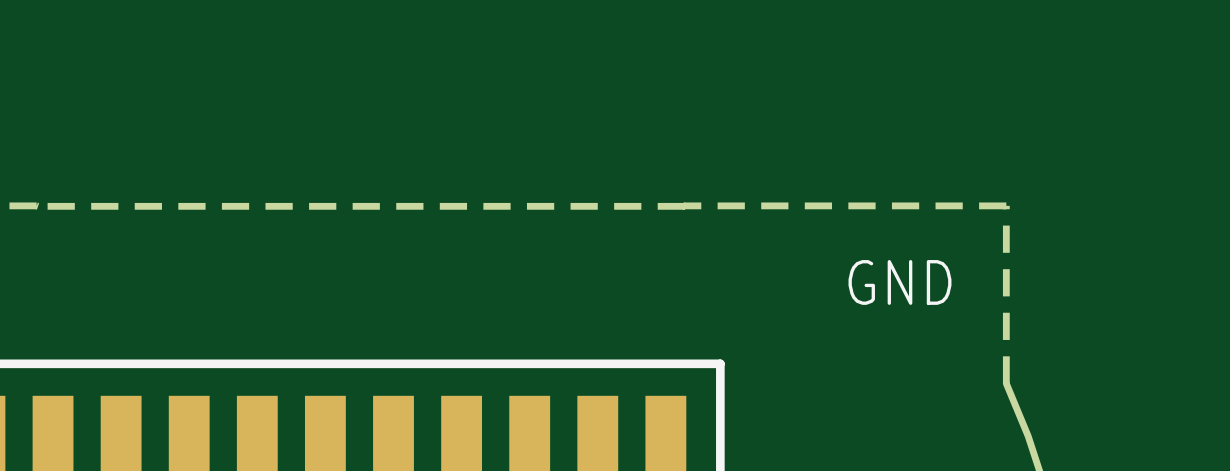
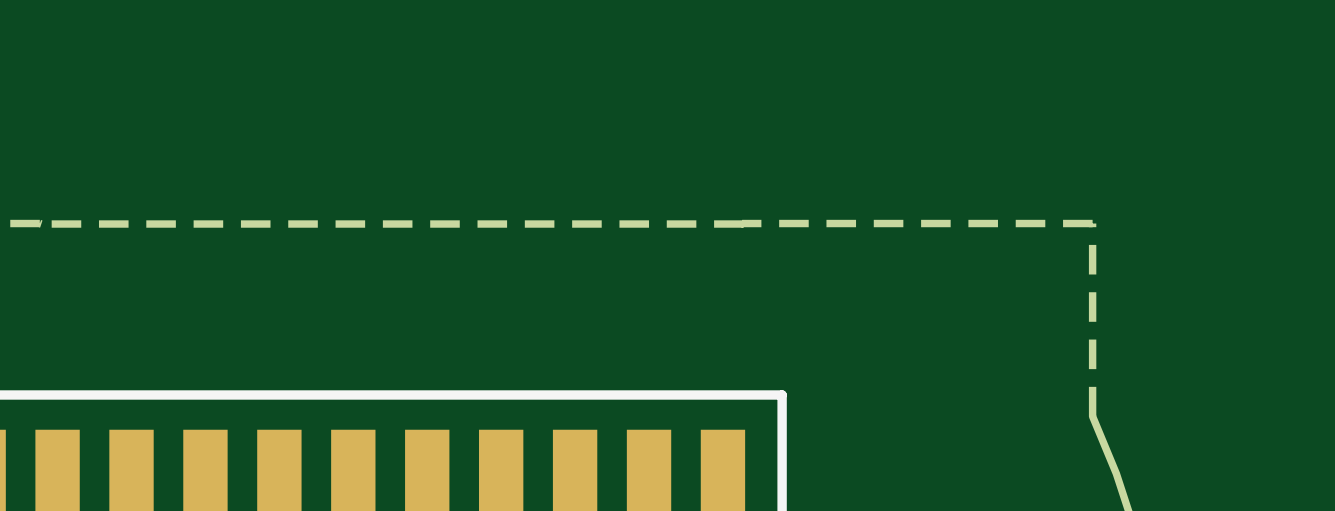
text: GND (899, 282) -> none

